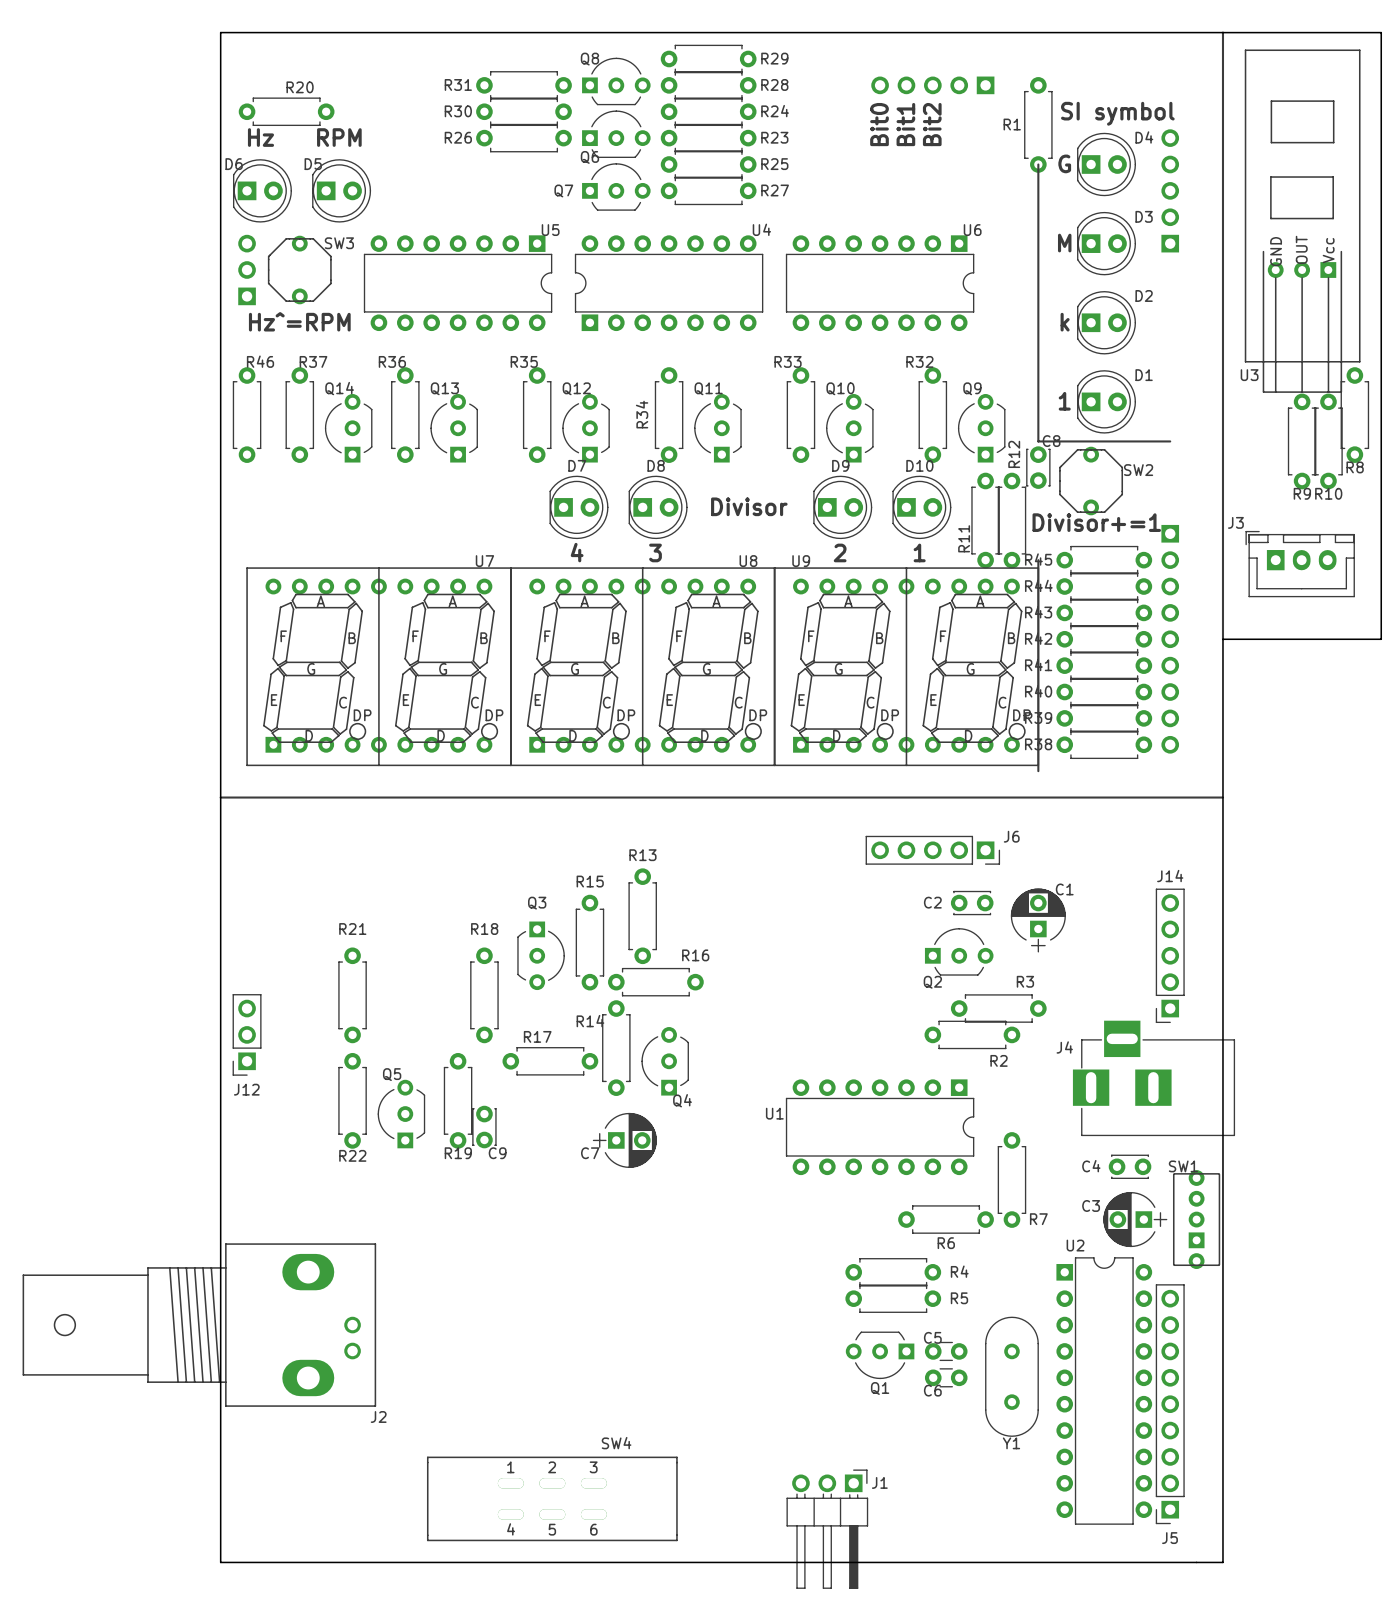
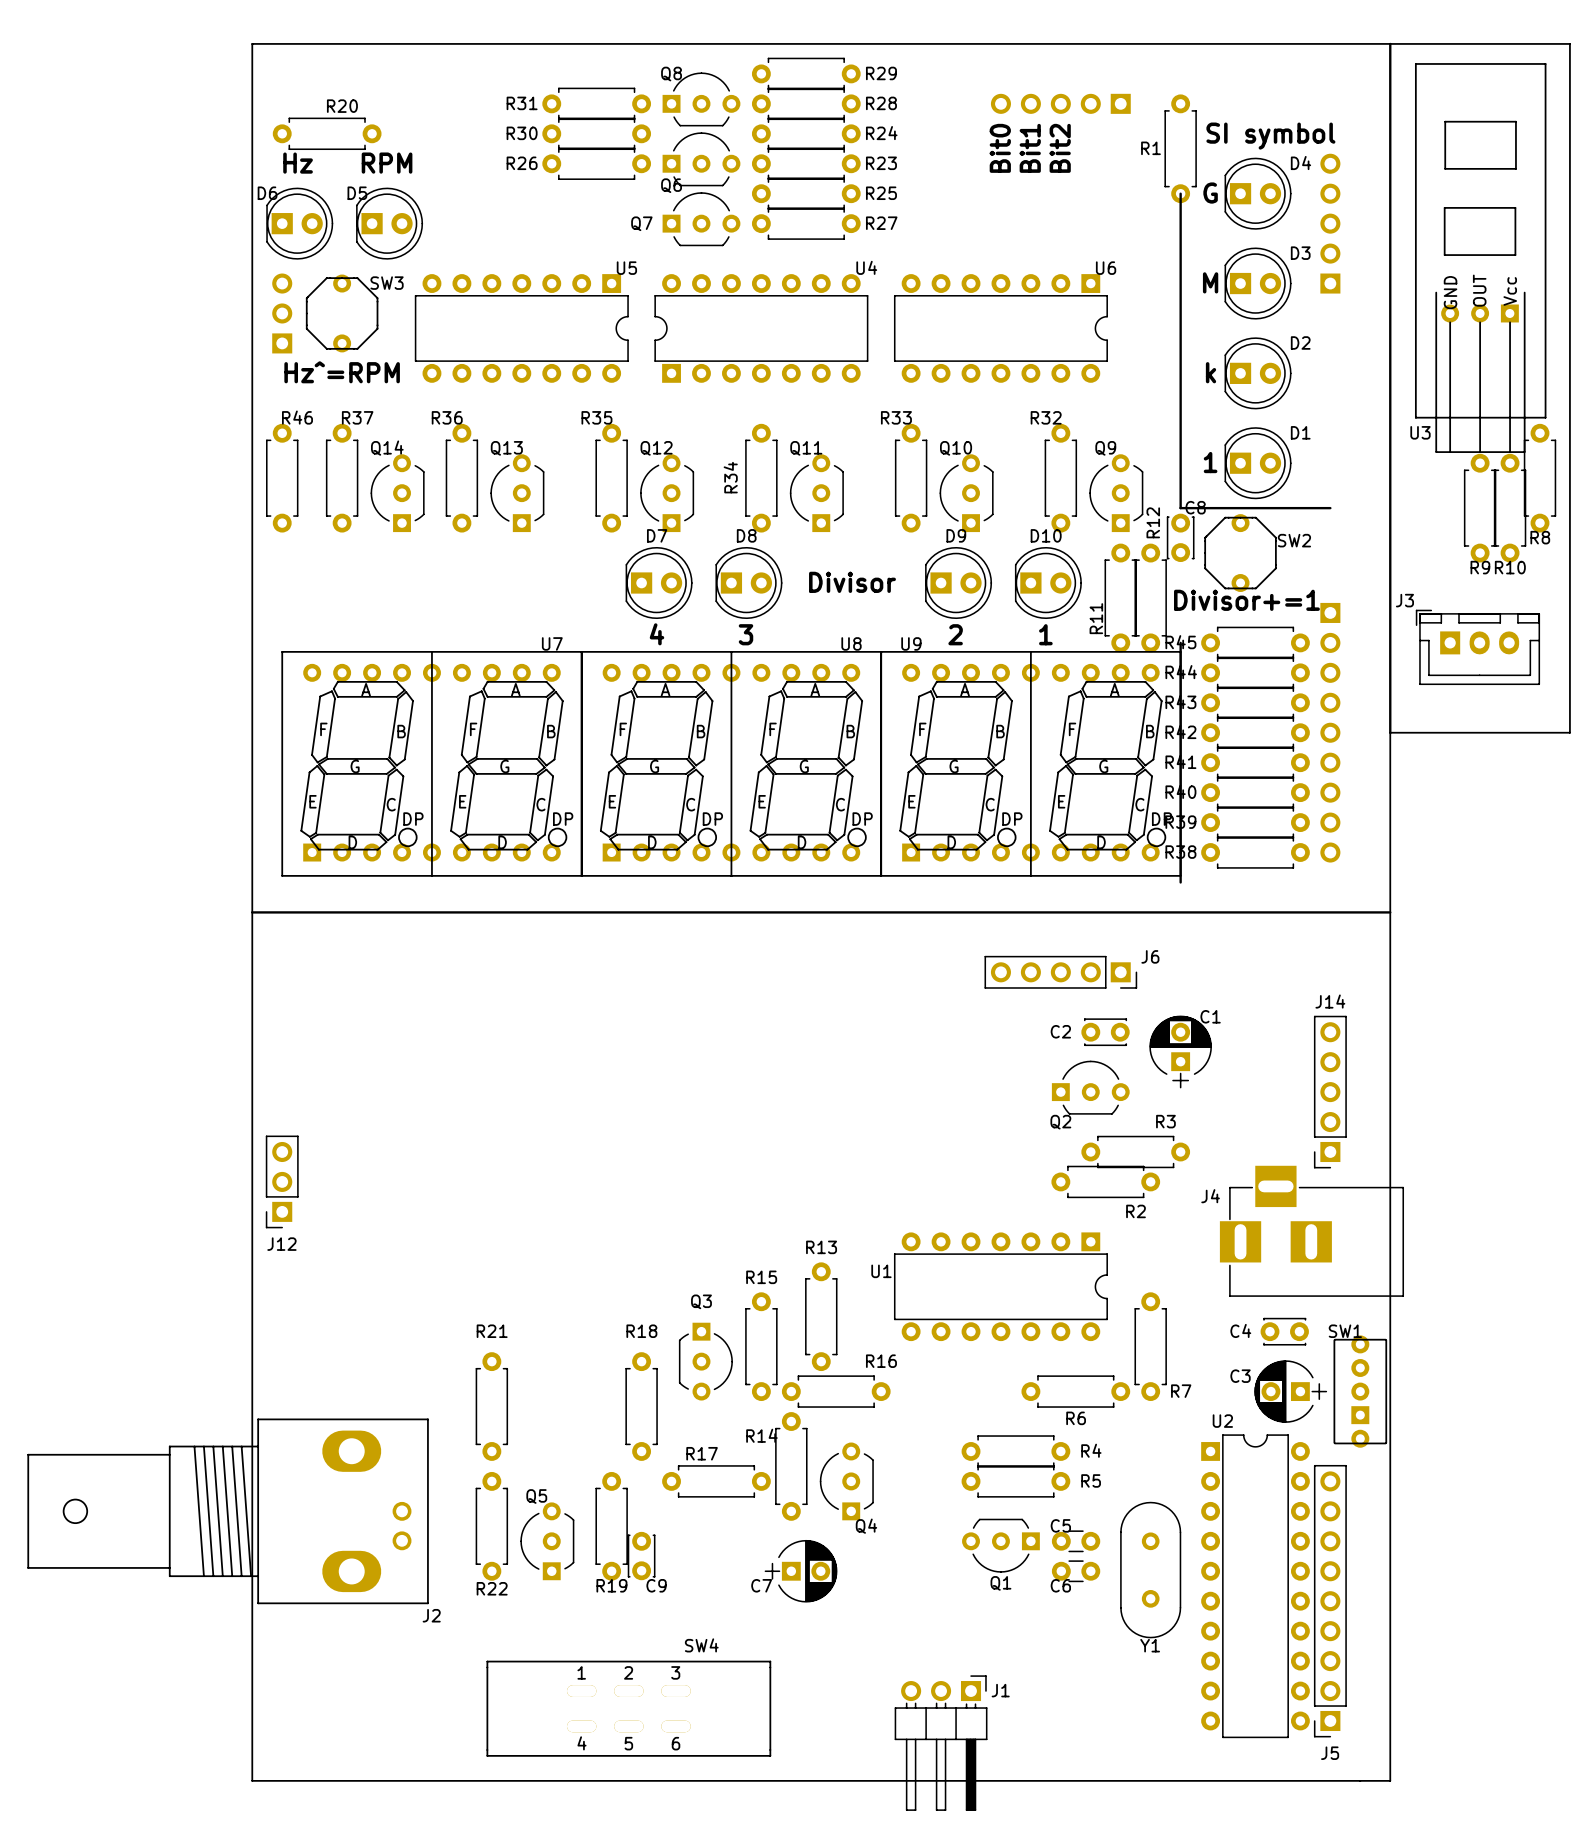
R13 position: (642, 916) -> (821, 1316)
R15 position: (589, 942) -> (761, 1346)
Q3 position: (541, 955) -> (705, 1361)
R16 position: (655, 982) -> (836, 1391)
R21 position: (352, 995) -> (491, 1406)
R18 position: (484, 995) -> (641, 1406)
R14 position: (616, 1048) -> (791, 1466)
R17 position: (550, 1061) -> (716, 1481)
Q4 position: (665, 1061) -> (846, 1481)
R22 position: (352, 1100) -> (491, 1526)
R19 position: (458, 1100) -> (611, 1526)
Q5 position: (401, 1114) -> (547, 1541)
C9 position: (484, 1127) -> (641, 1556)
C7 position: (624, 1140) -> (801, 1571)

